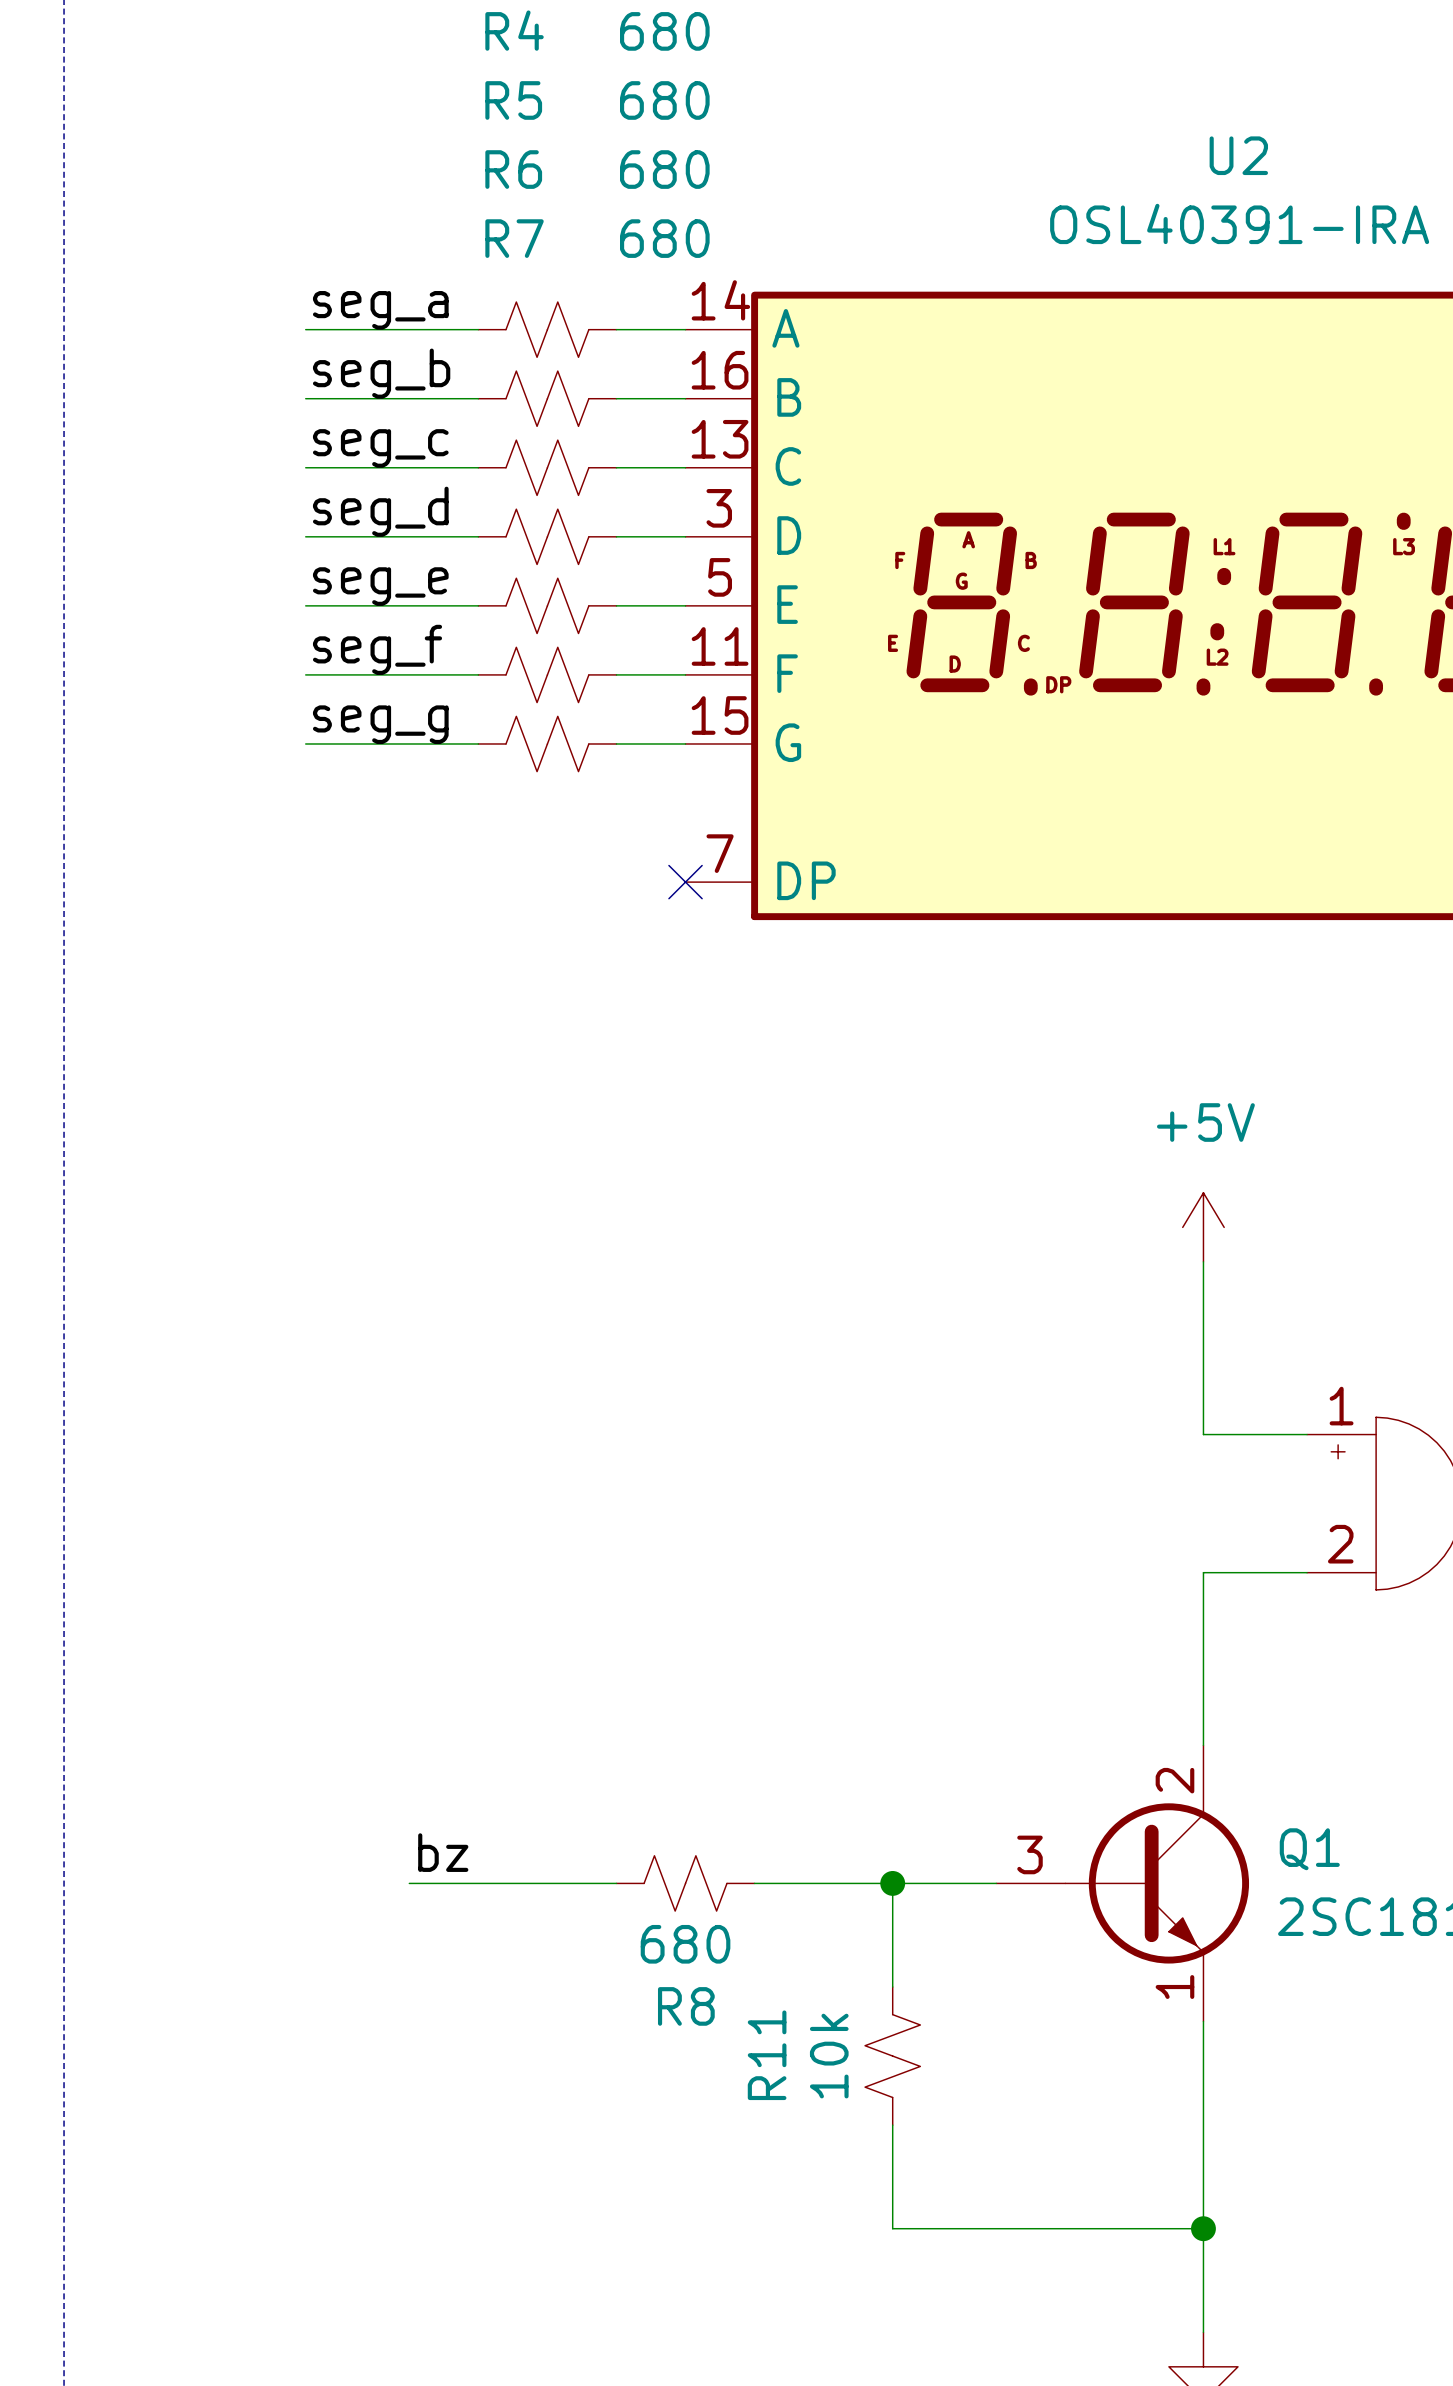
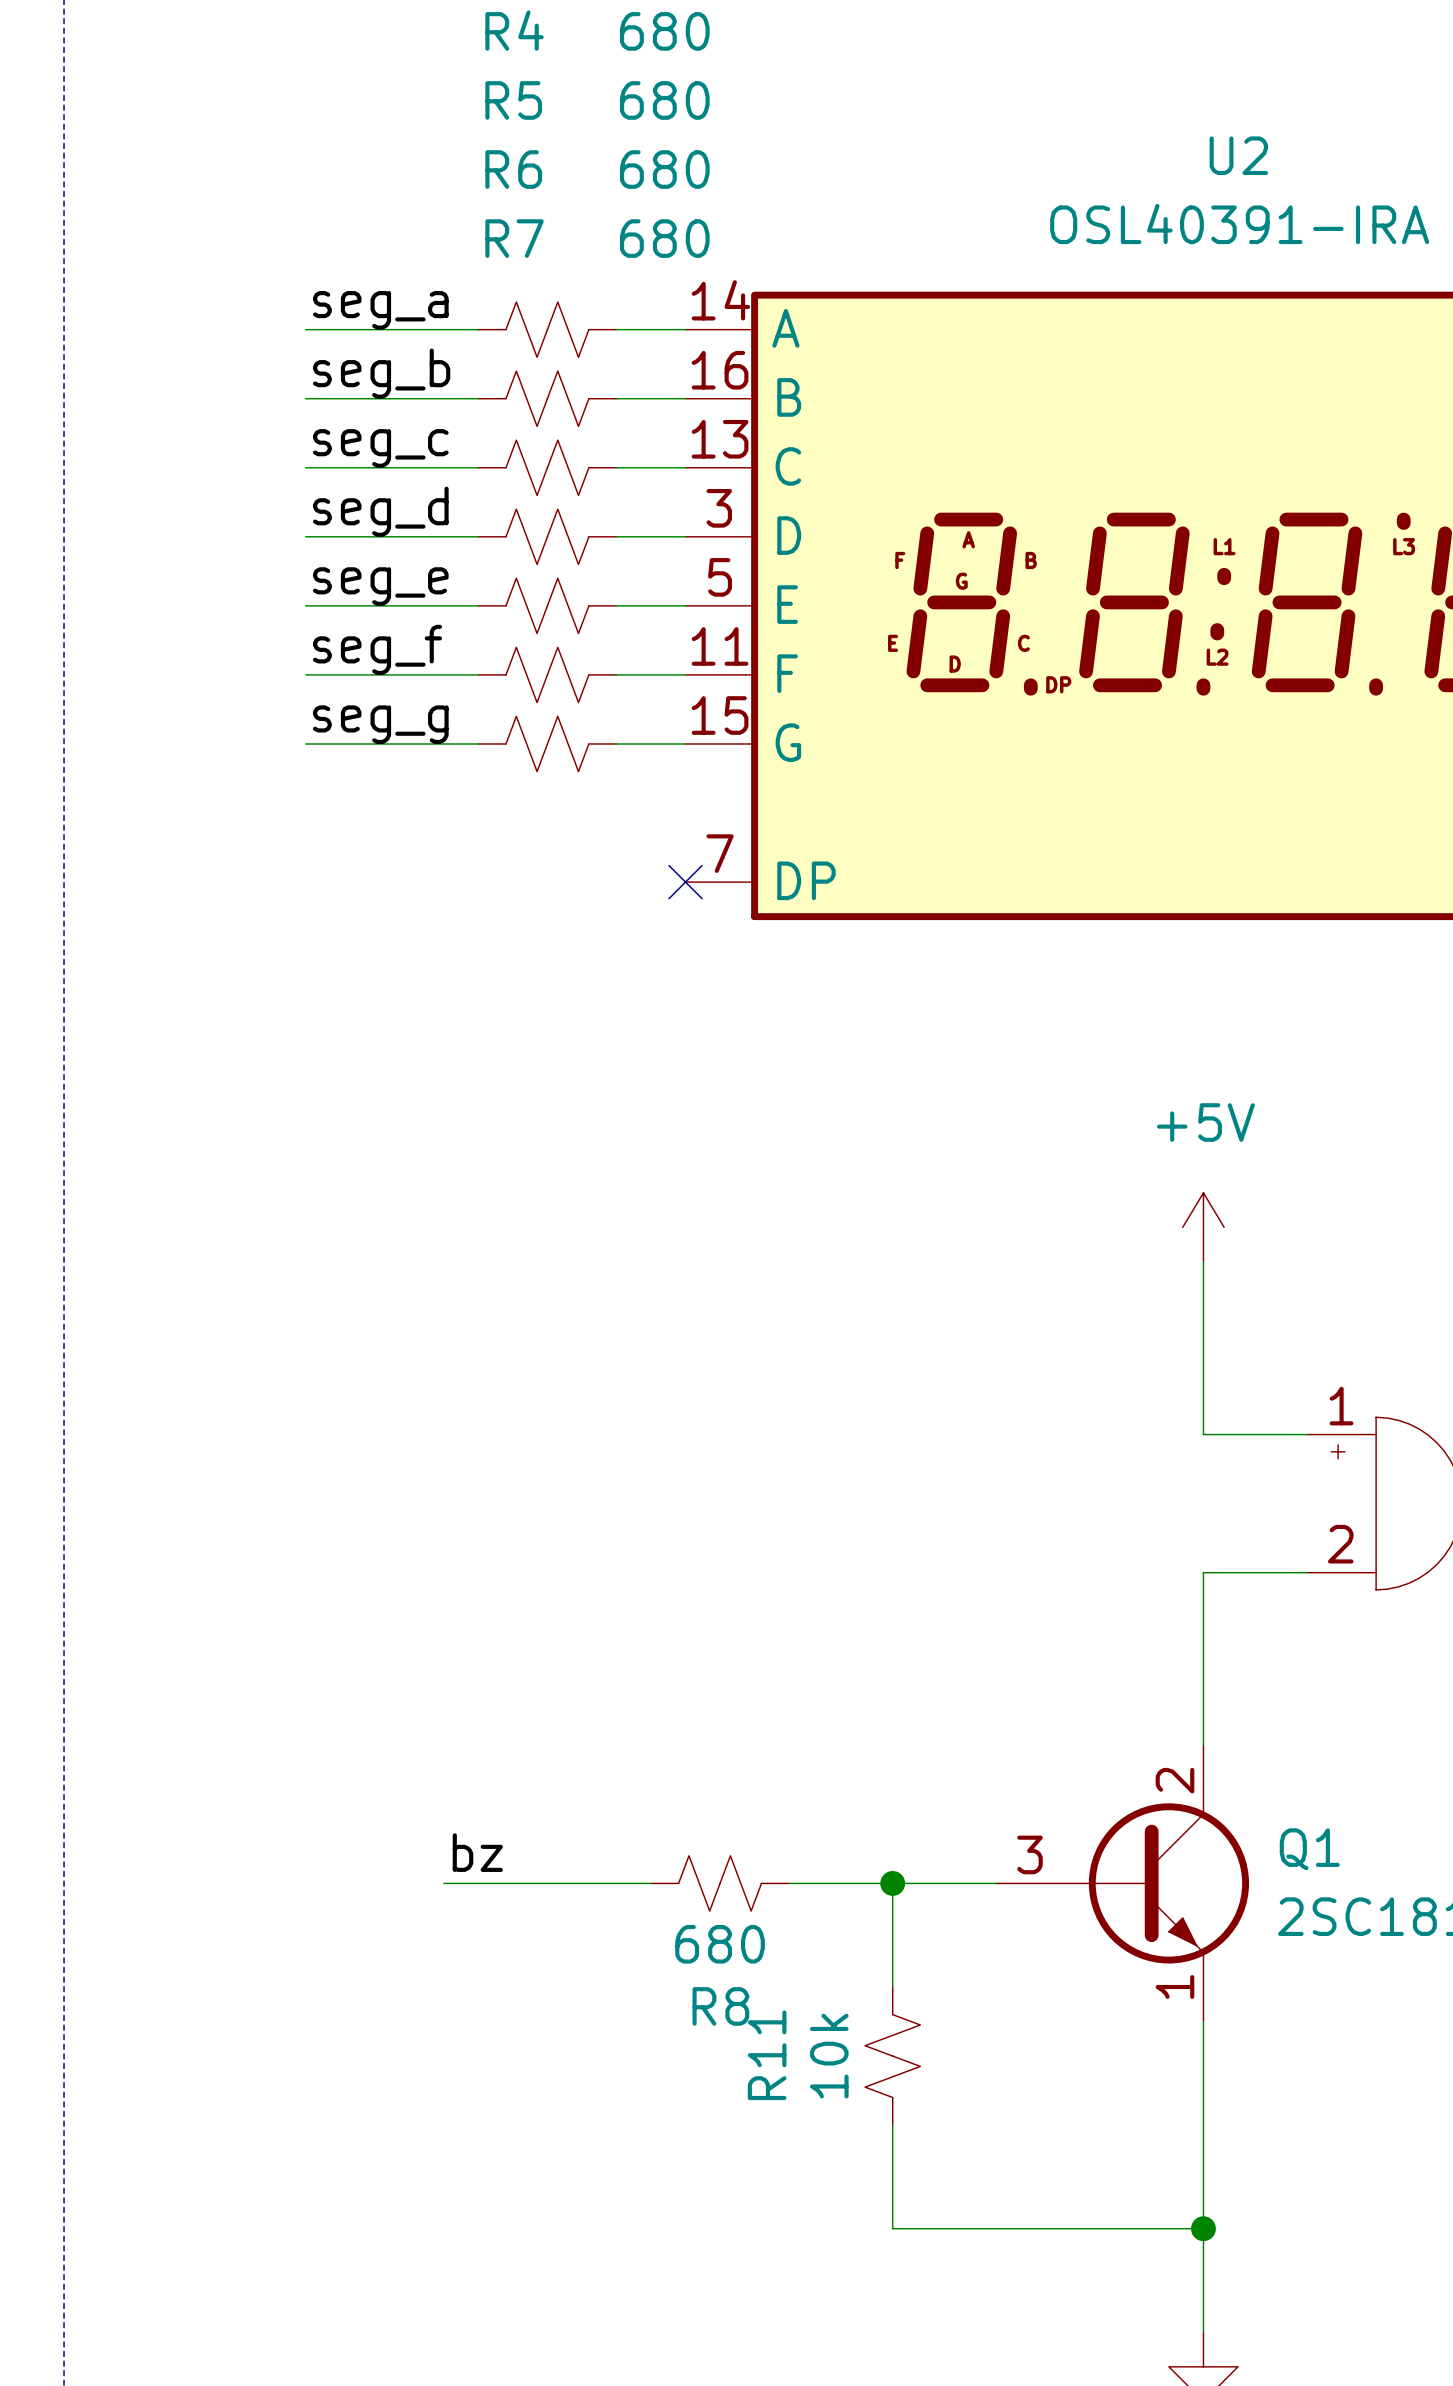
label position: bz (443, 1852) -> bz (477, 1852)
wire: (409, 1883) (443, 1883) -> none
R8 position: (685, 1883) -> (720, 1883)

